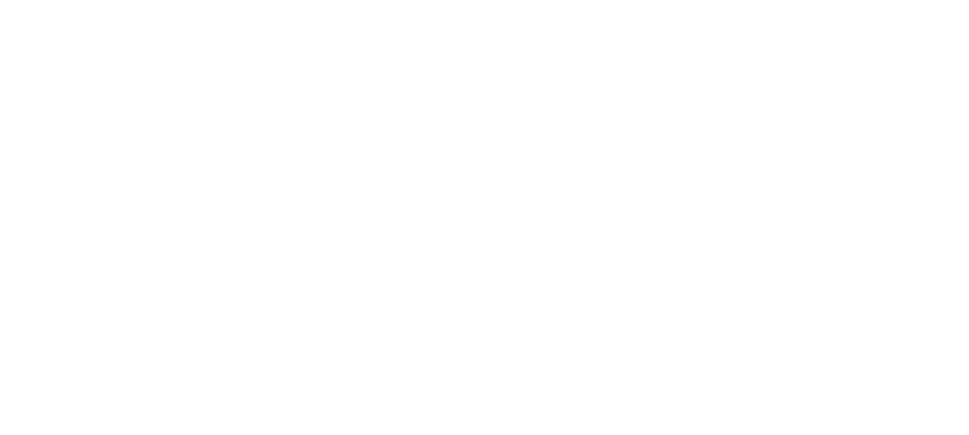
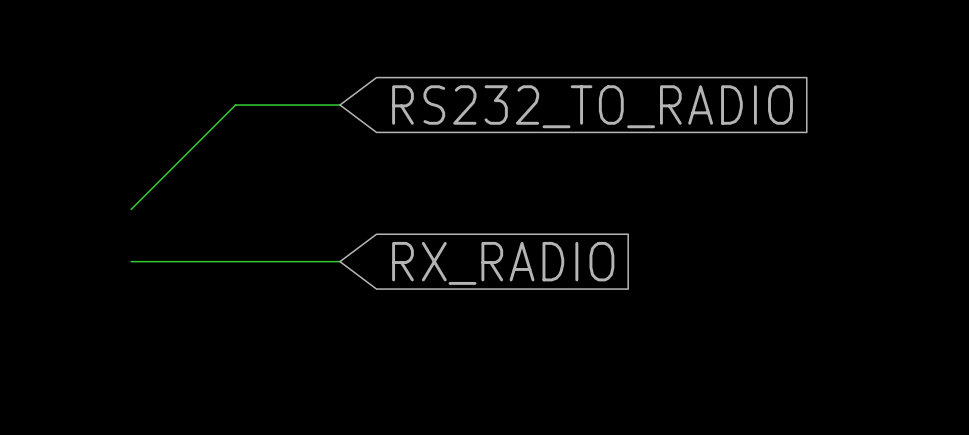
wire: none -> (339, 105) (235, 105) (131, 209)
global label: none -> RS232_TO_RADIO (592, 106)
wire: none -> (131, 261) (339, 261)
global label: none -> RX_RADIO (503, 263)

